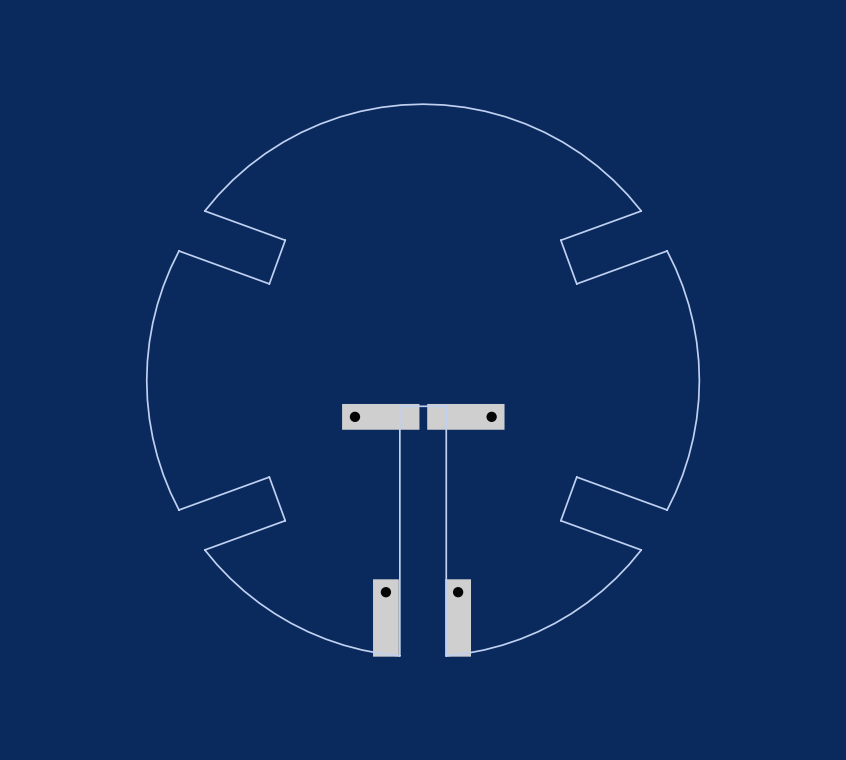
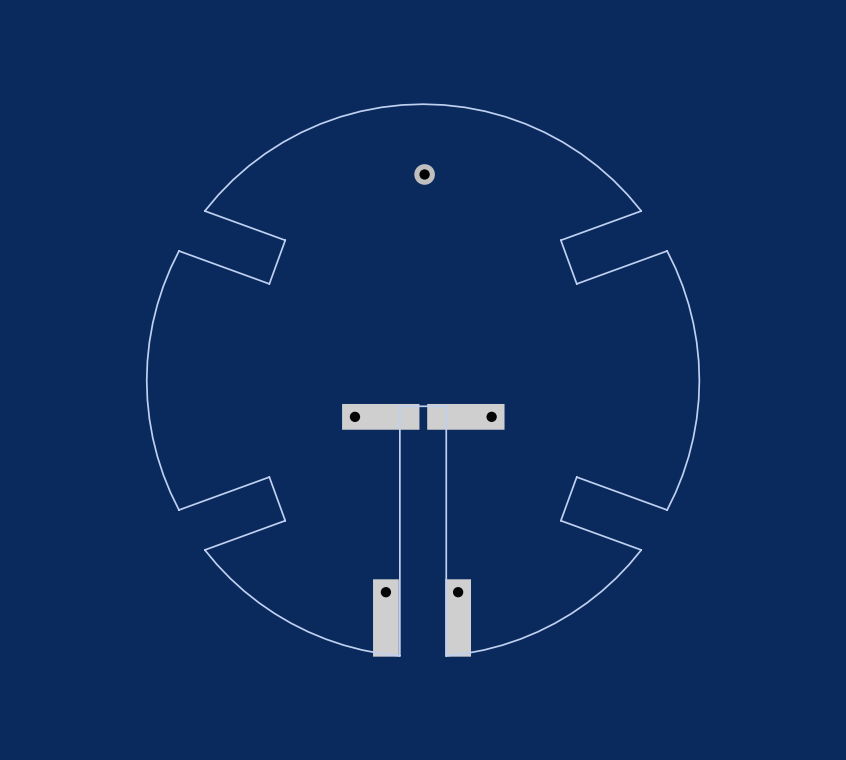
via: none -> (424, 174)

